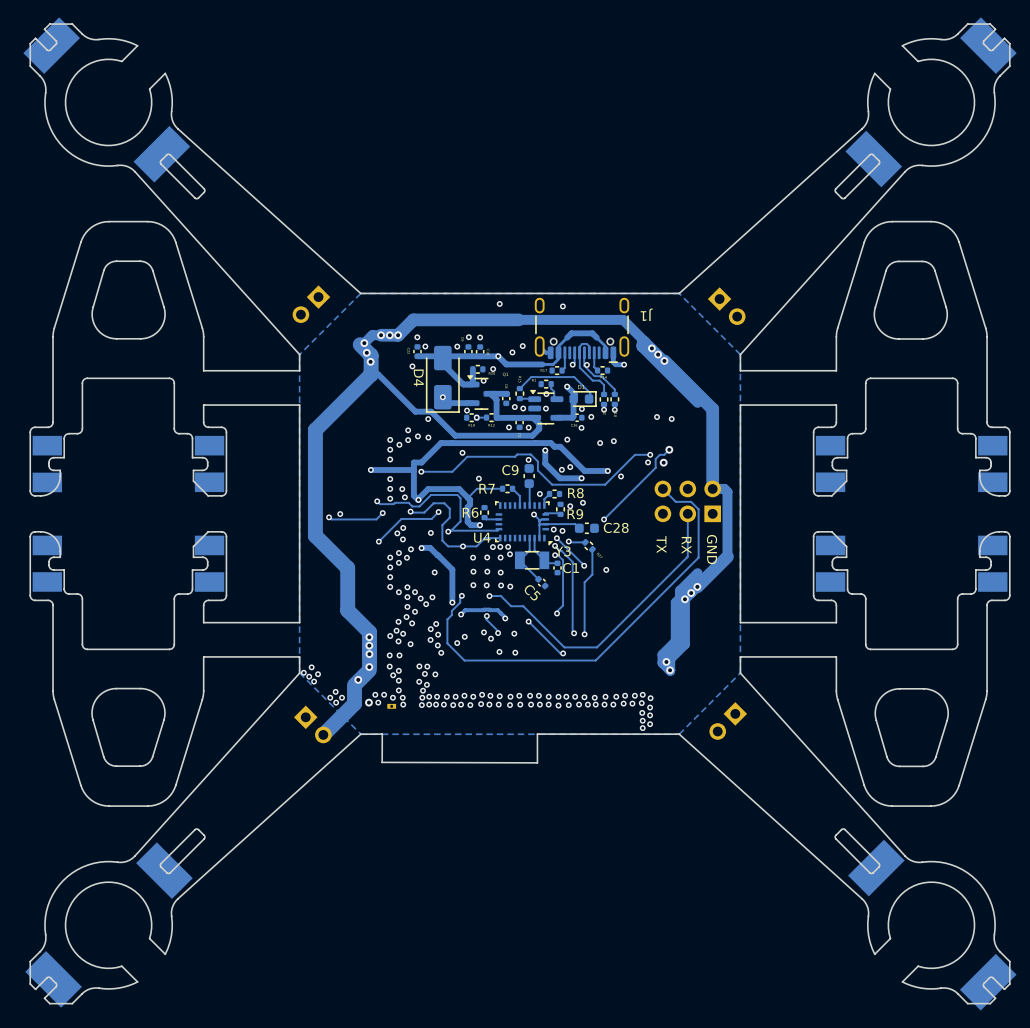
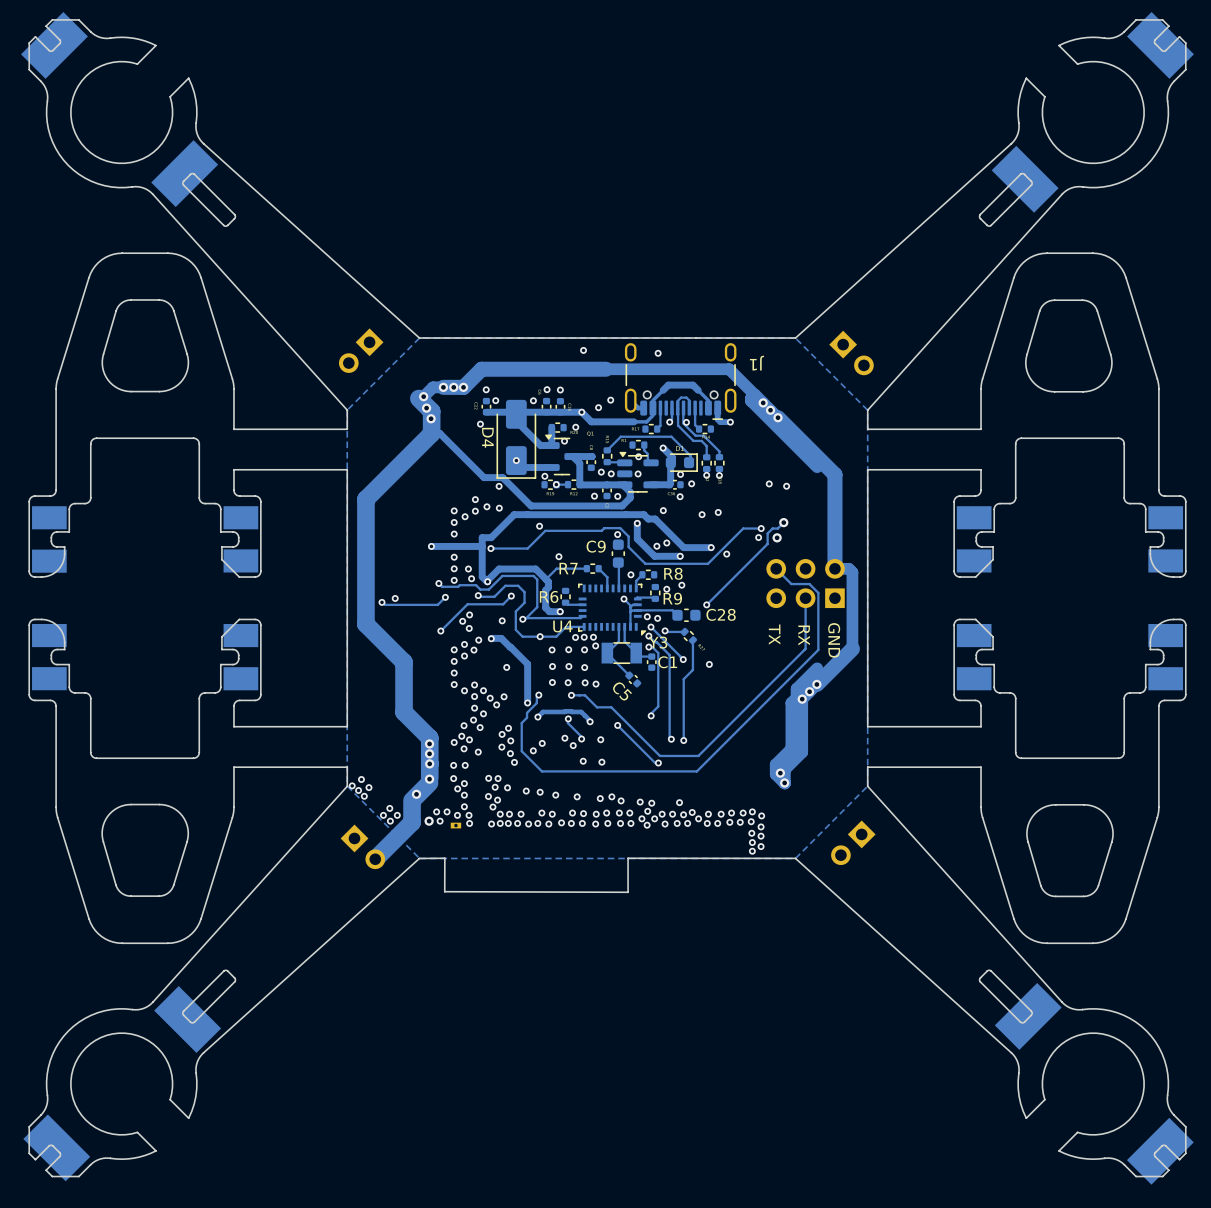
via: none -> (526, 791)
via: none -> (540, 792)
via: none -> (555, 795)
via: none -> (577, 796)
via: none -> (611, 796)
via: none -> (600, 798)
via: none -> (621, 800)
via: none -> (640, 802)
via: none -> (679, 802)
via: none -> (651, 803)
via: (482, 694) -> none
via: none -> (647, 811)
via: none -> (692, 812)
via: (455, 696) -> none
via: (548, 696) -> none
via: (558, 696) -> none
via: (422, 697) -> none
via: (594, 697) -> none
via: none -> (641, 818)
via: none -> (654, 818)
via: none -> (698, 818)
via: (548, 704) -> none
via: (595, 704) -> none
via: (558, 705) -> none
via: none -> (647, 825)

